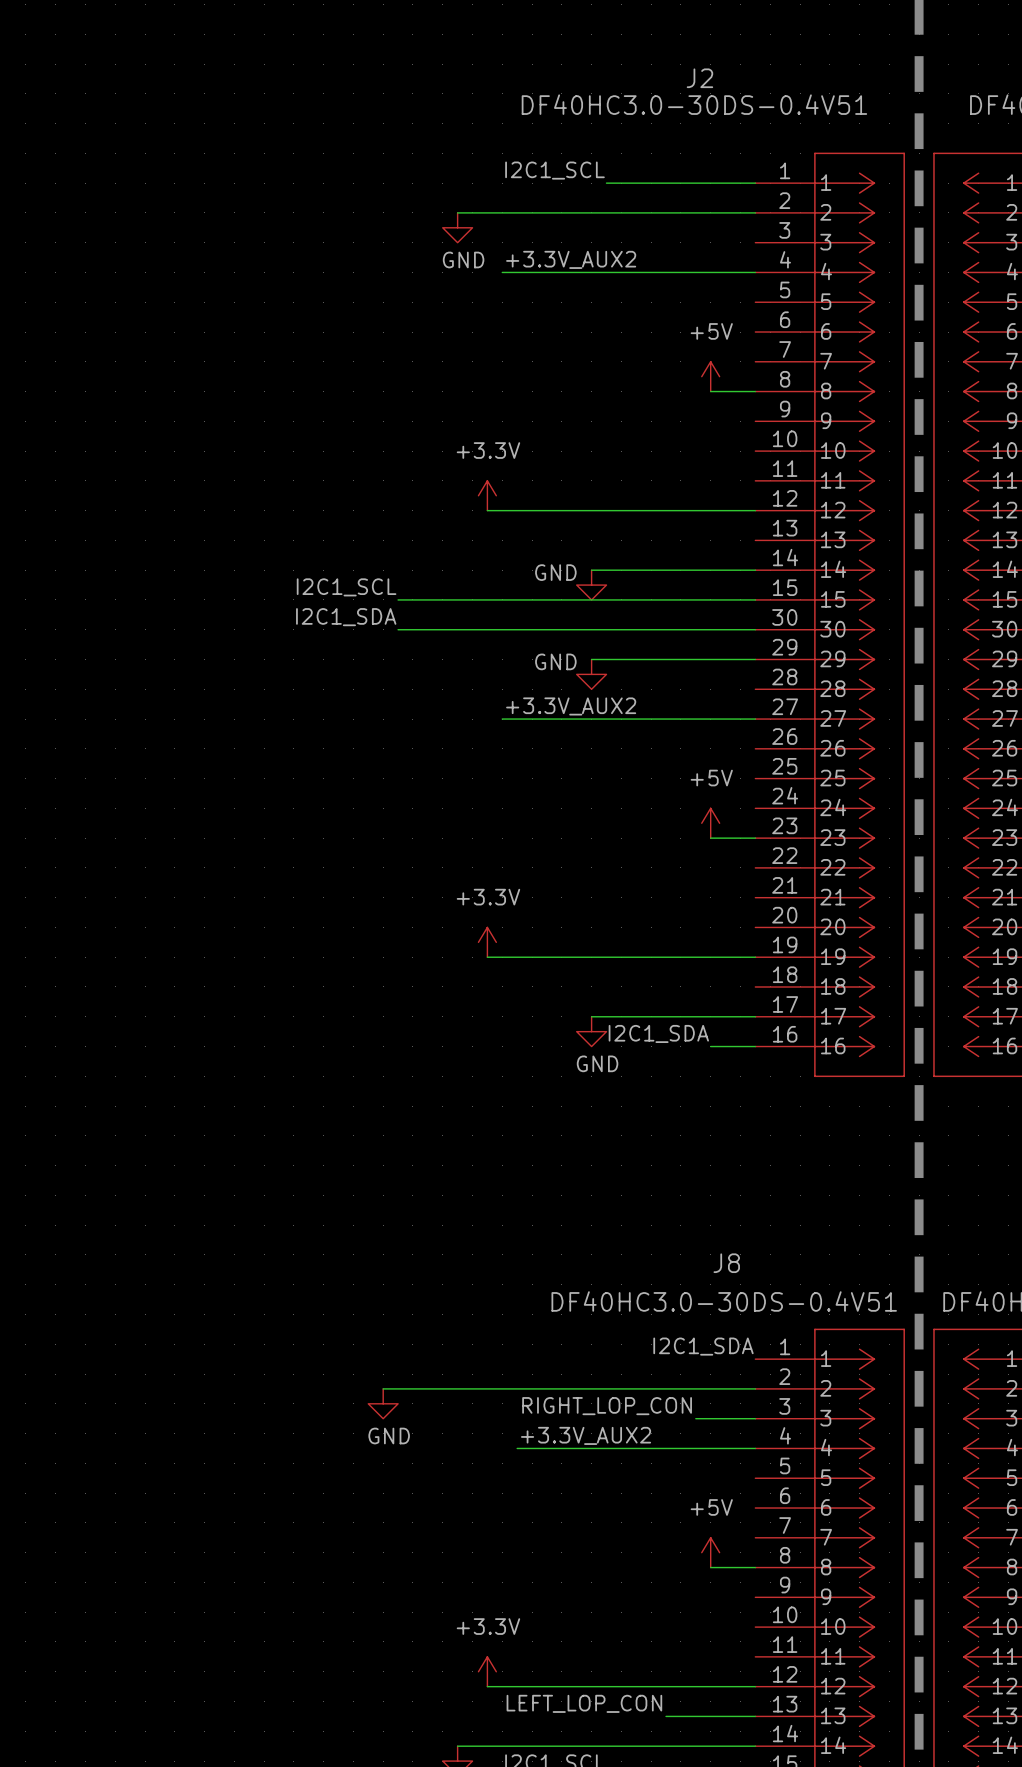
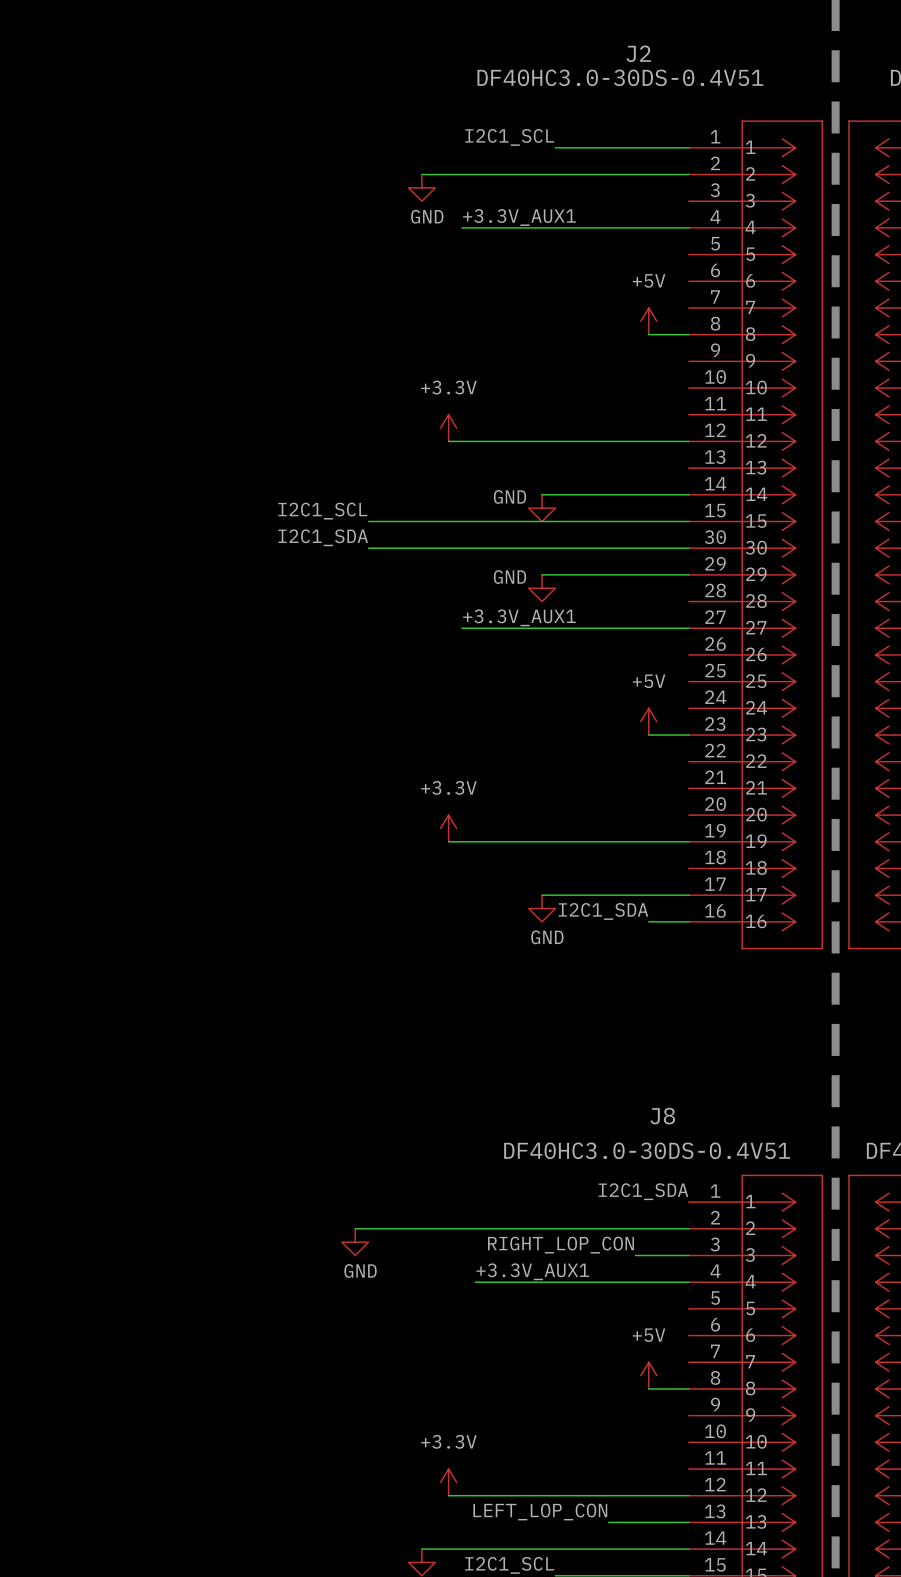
label: +3.3V_AUX2 (571, 259) -> +3.3V_AUX1 (519, 217)
label: +3.3V_AUX2 (571, 706) -> +3.3V_AUX1 (519, 617)
label: +3.3V_AUX2 (586, 1435) -> +3.3V_AUX1 (532, 1271)

